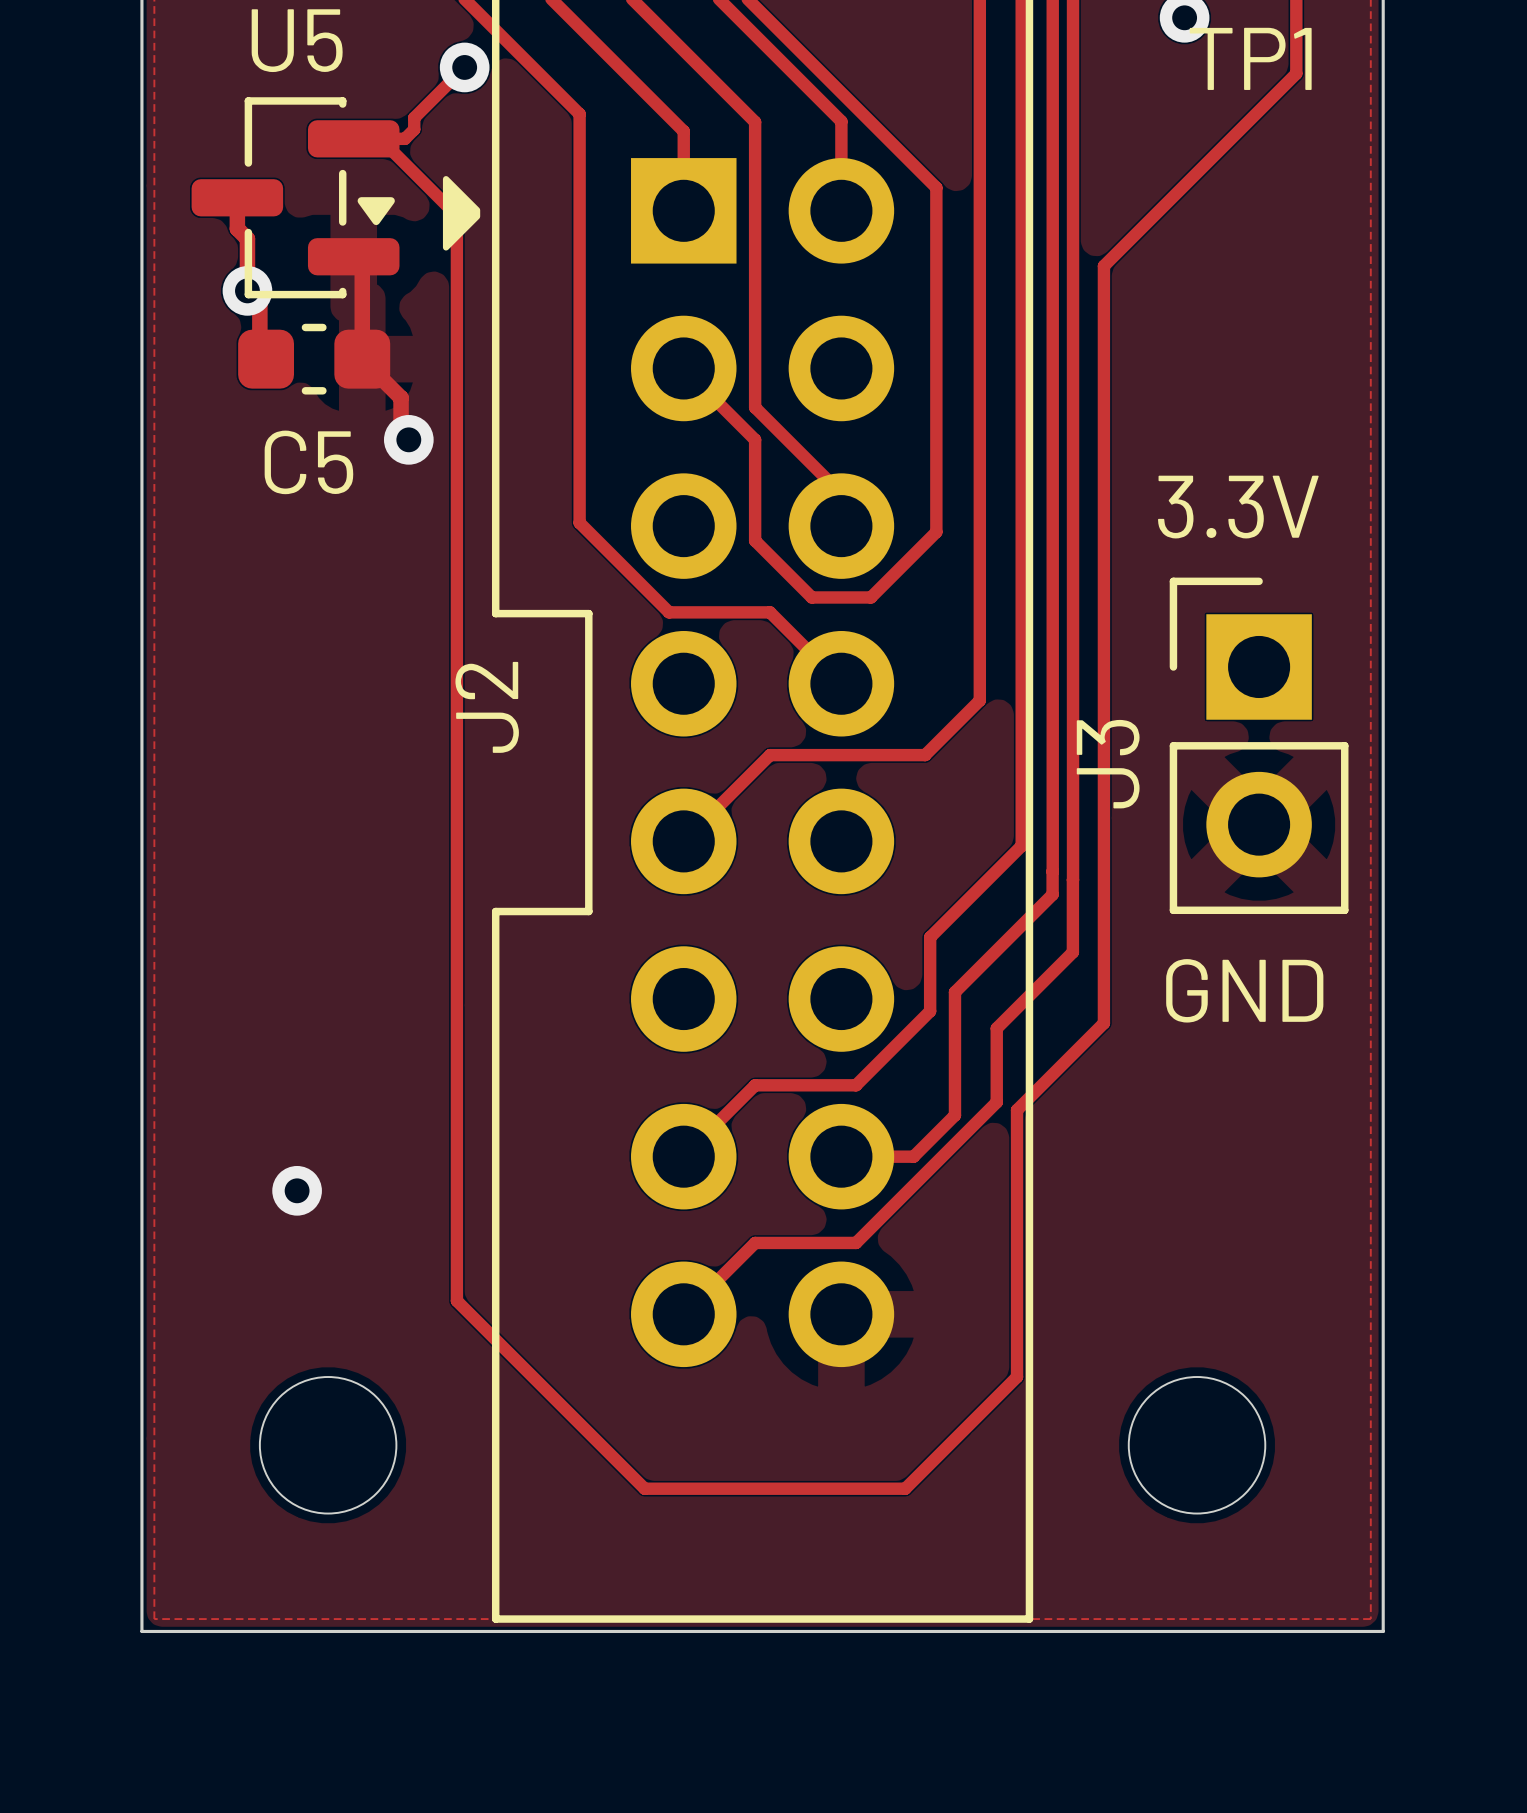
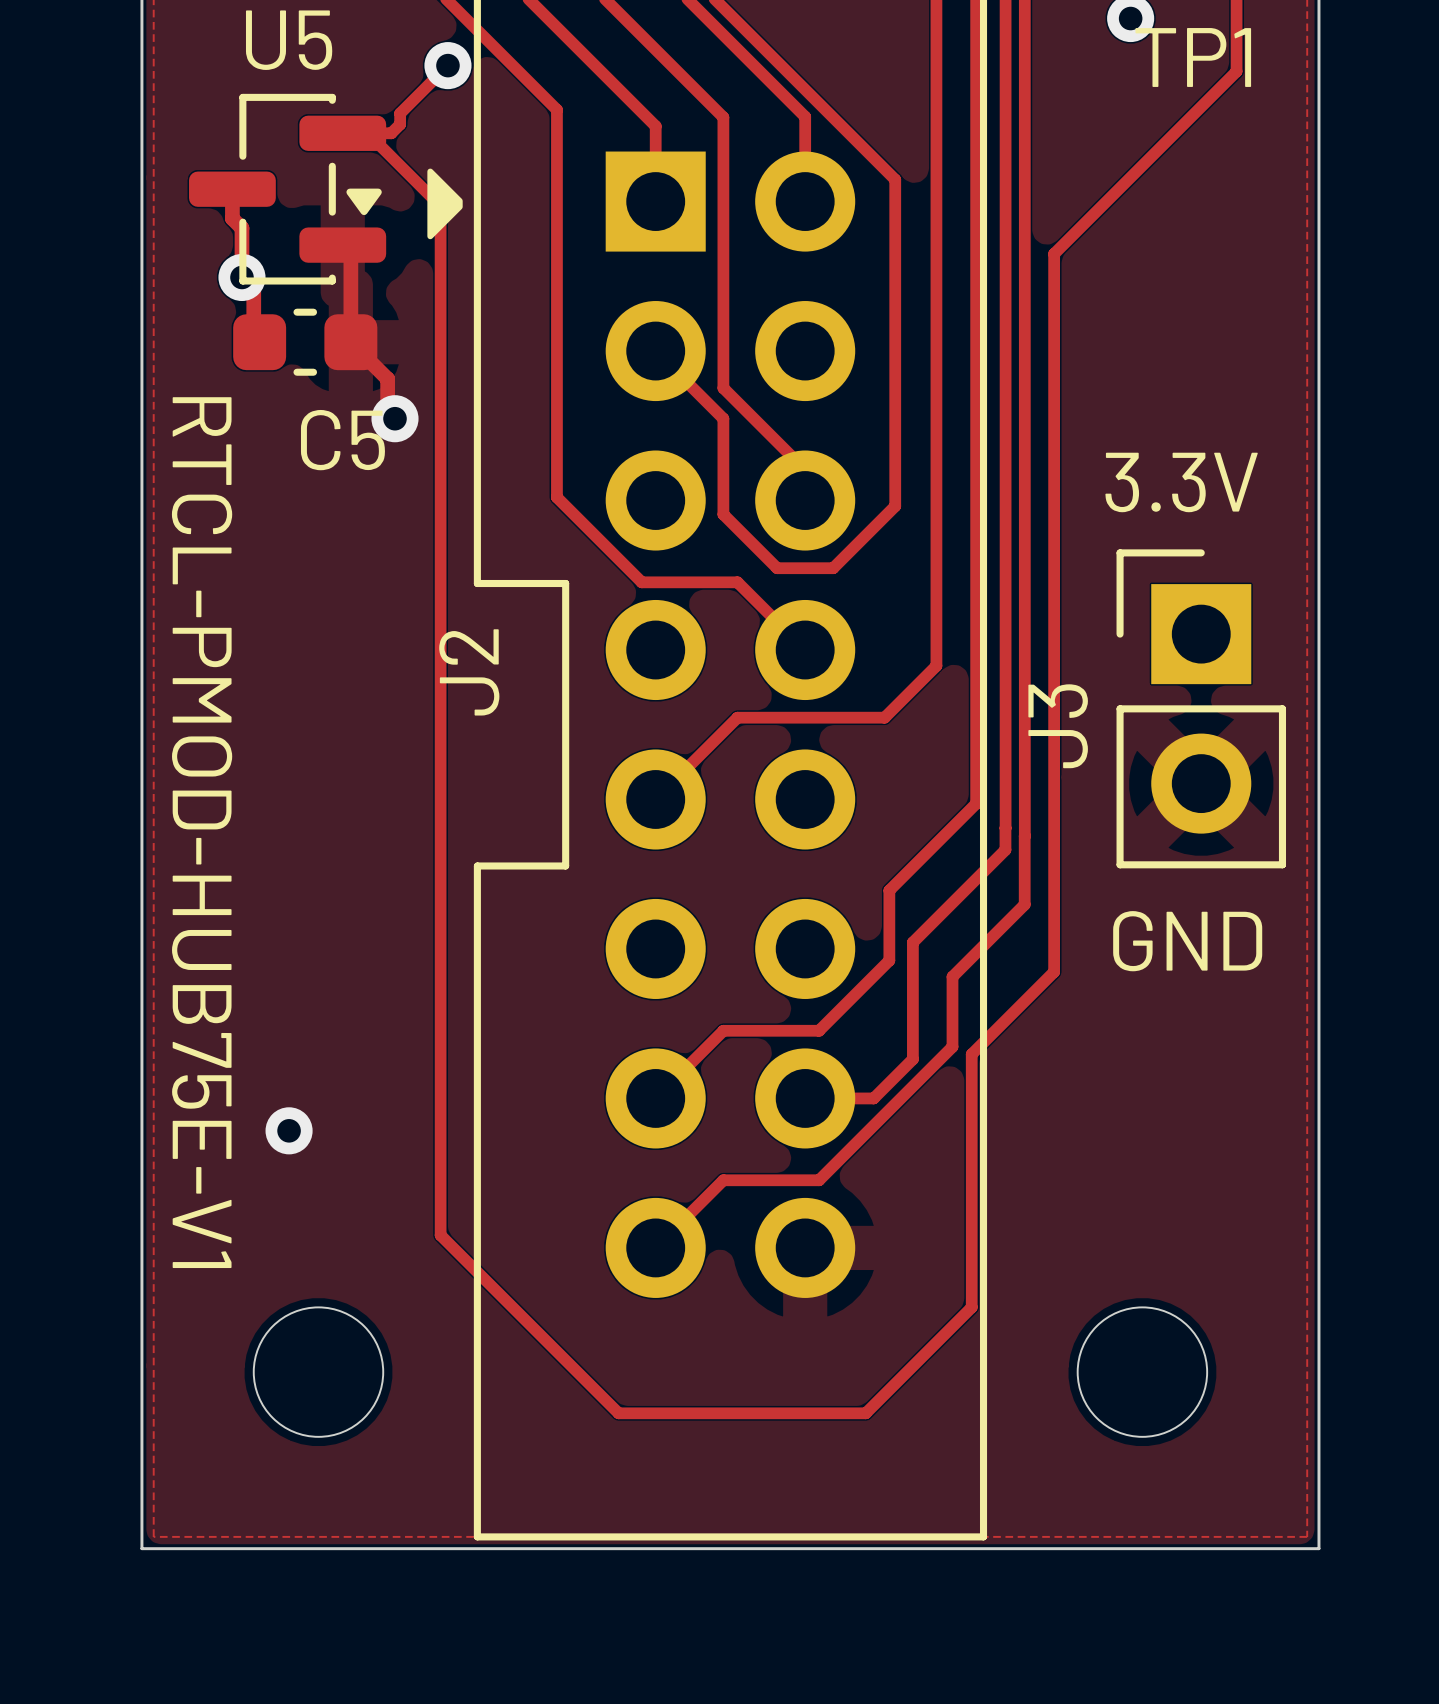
C5 name position: C5 (308, 462) -> C5 (342, 440)
text: none -> RTCL-PMOD-HUB75E-V1 (202, 832)

